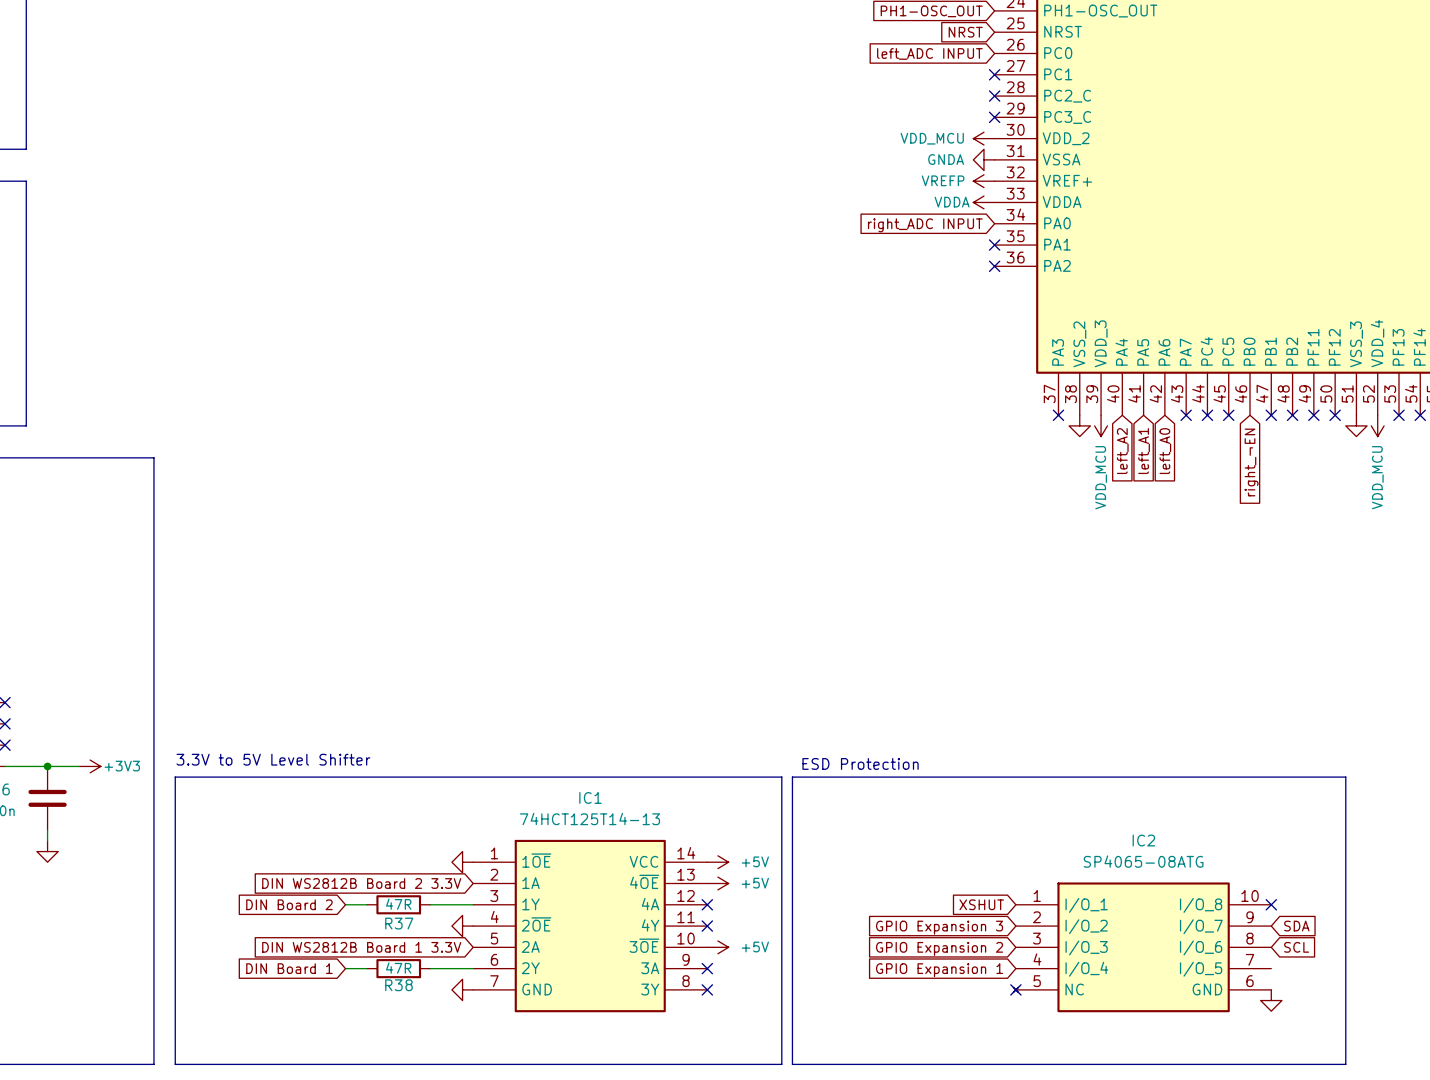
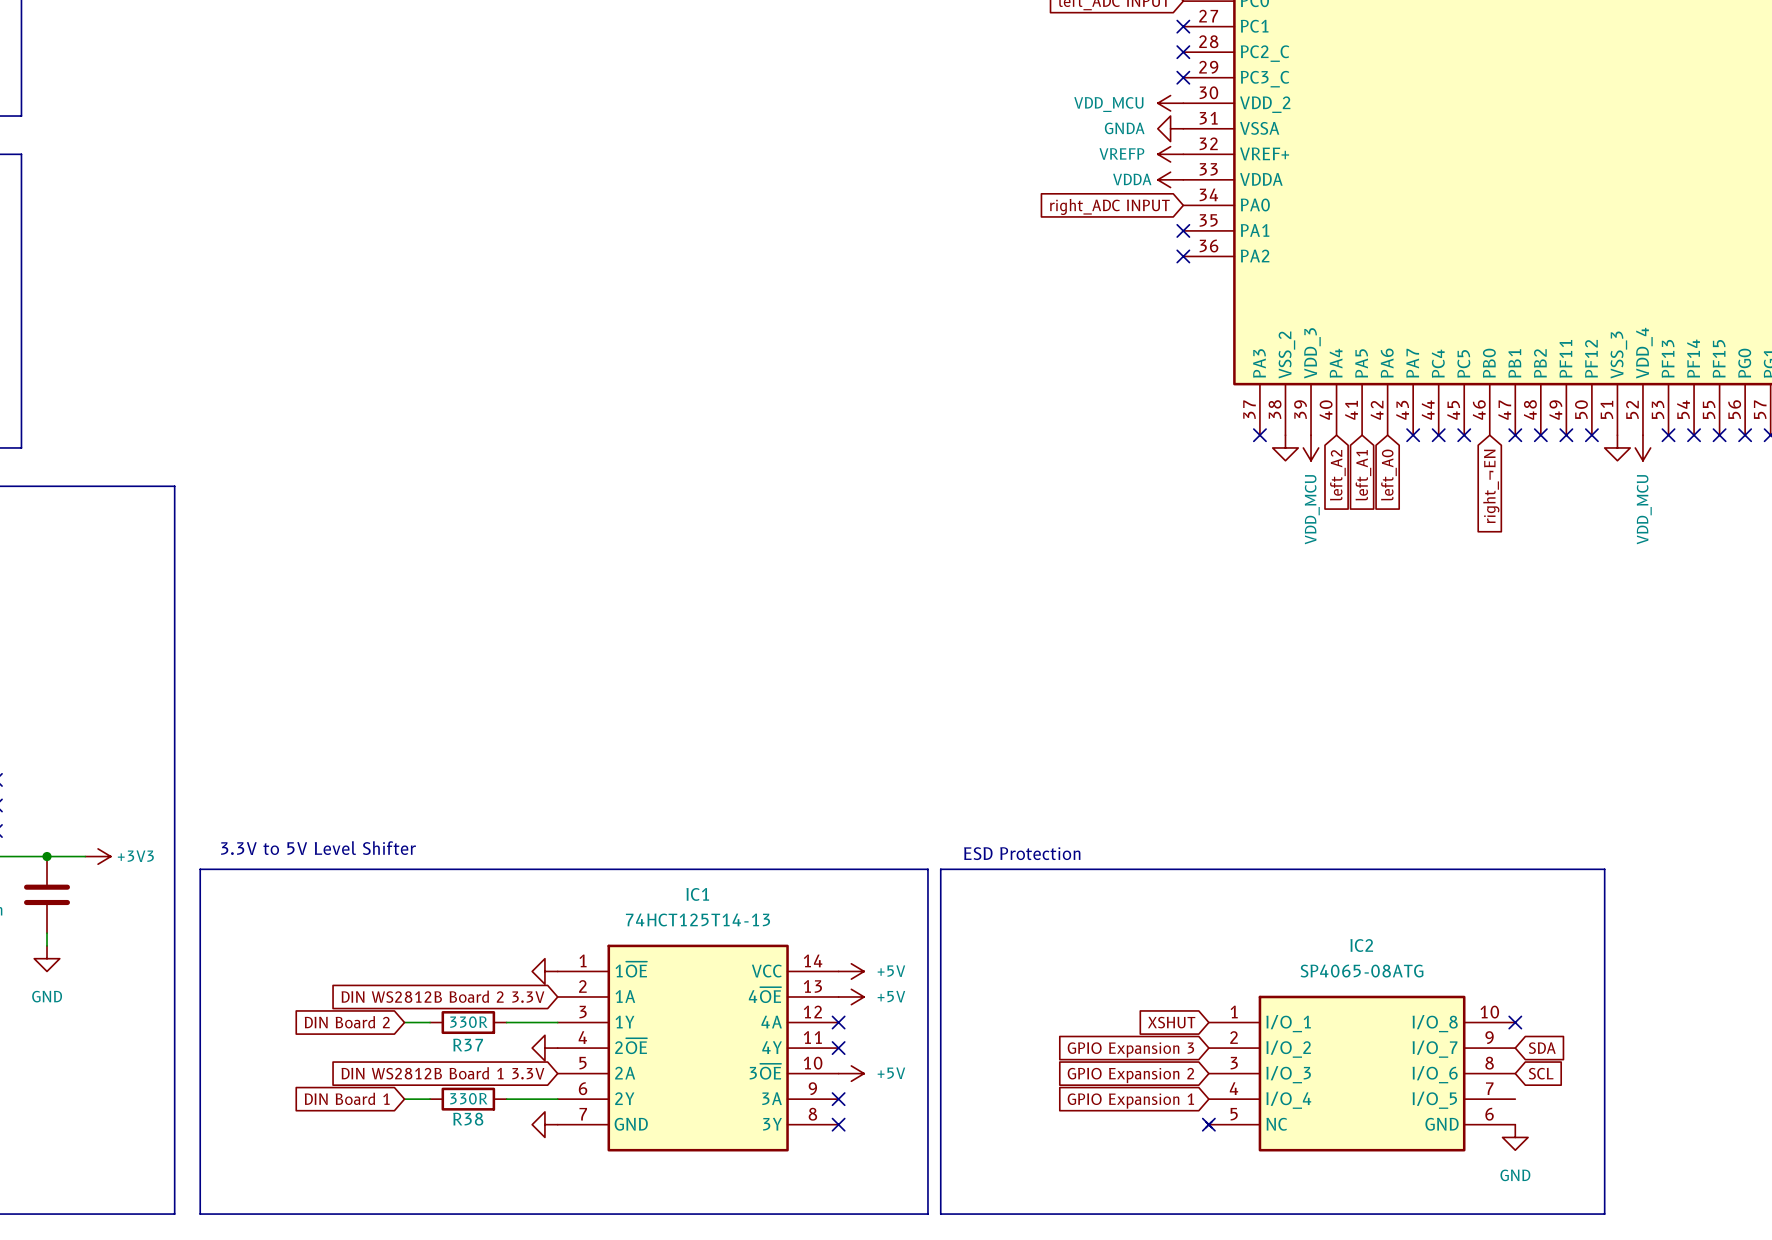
power symbol text: none -> GND (47, 996)
R37 value: 47R (398, 904) -> 330R (468, 1022)
R38 value: 47R (398, 968) -> 330R (468, 1098)
power symbol text: none -> GND (1515, 1175)

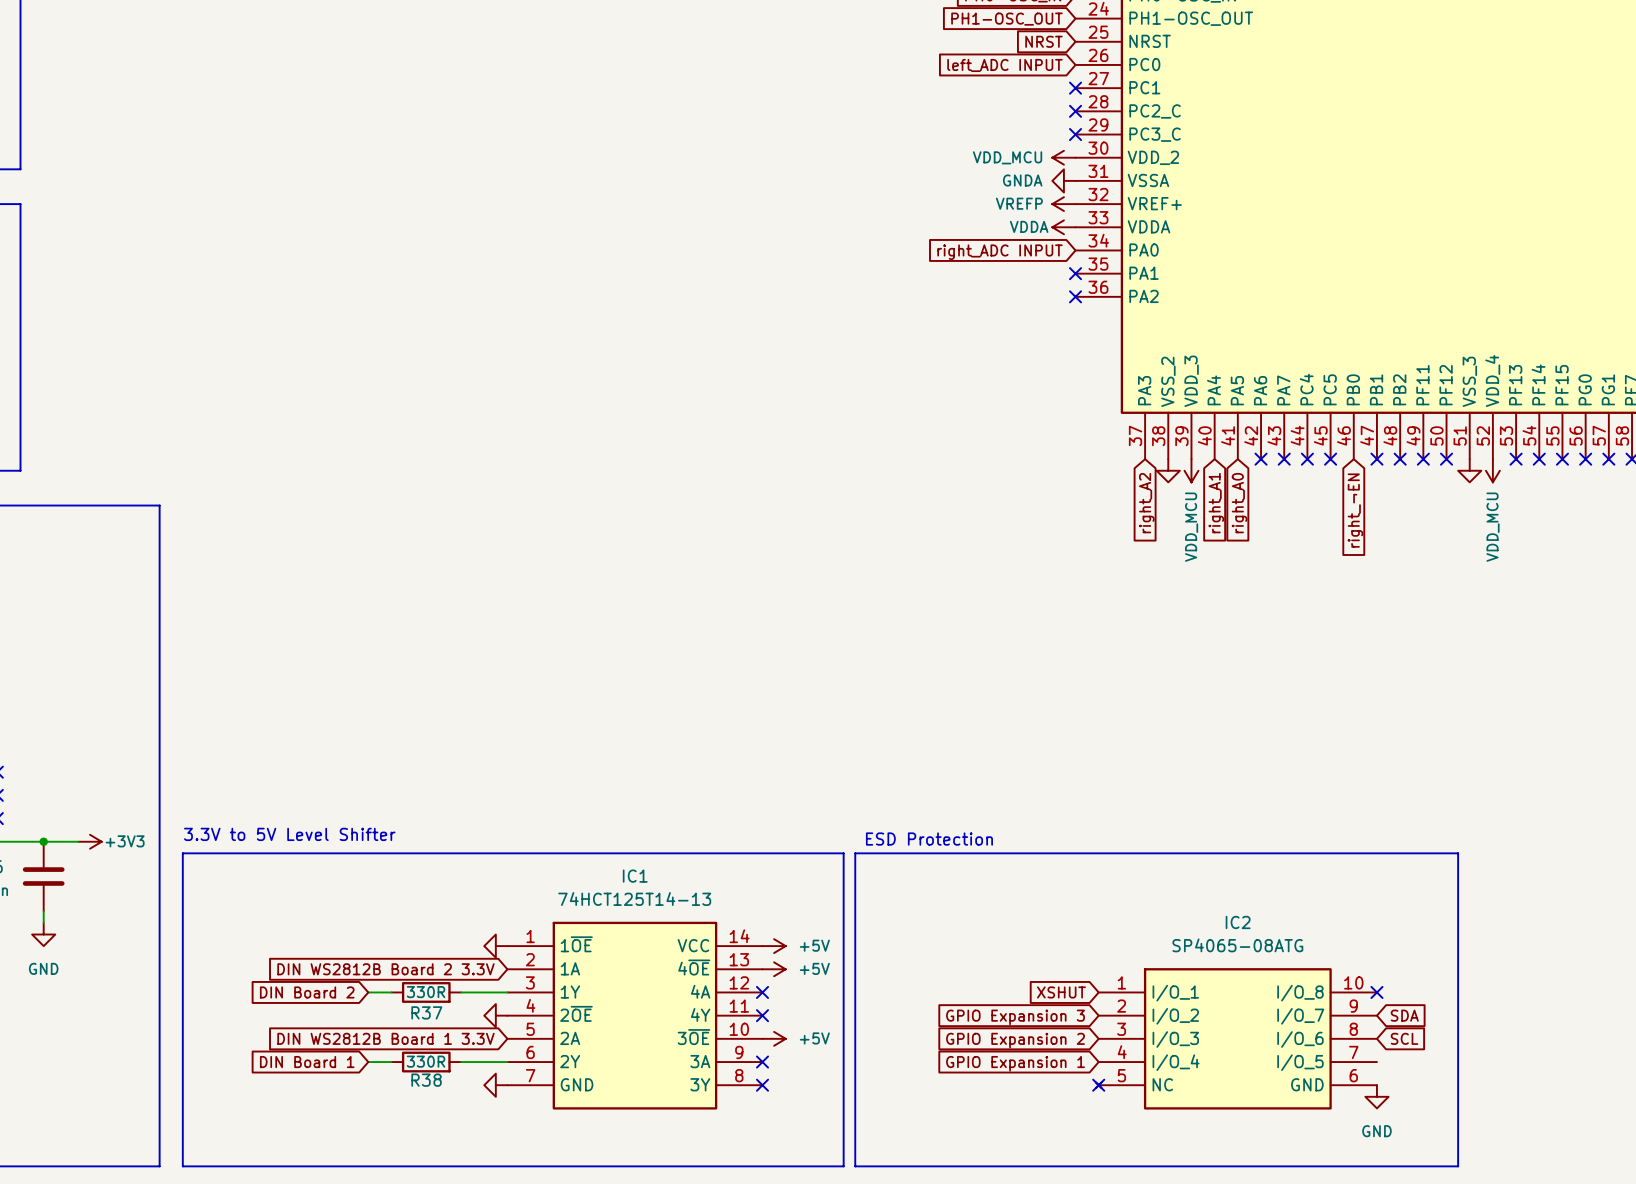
no-connect mark: (1259, 435) -> none
no-connect mark: none -> (1261, 459)
global label: left_A2 (1337, 475) -> right_A1 (1216, 503)
global label: left_A1 (1363, 475) -> right_A0 (1239, 503)
global label: left_A0 (1388, 475) -> none
global label: none -> right_A2 (1146, 503)

